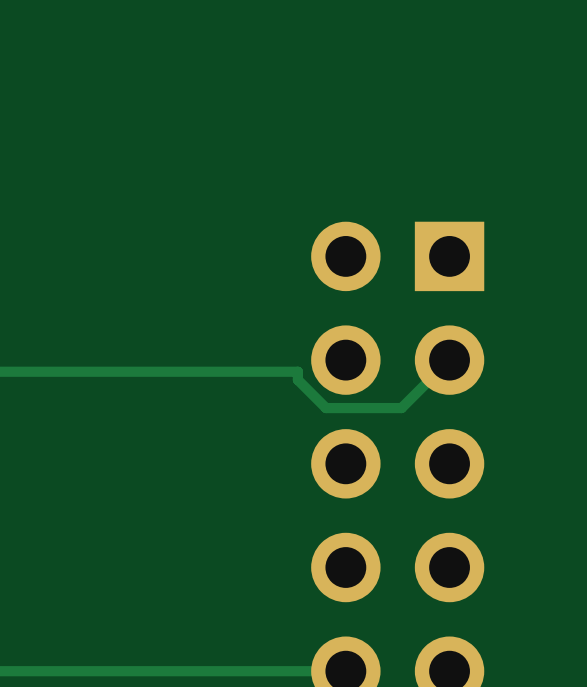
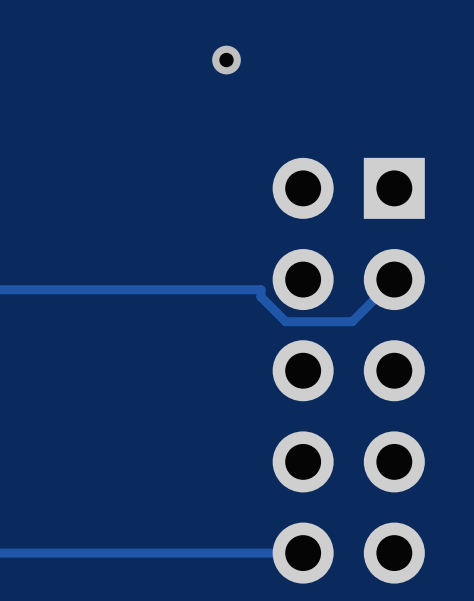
via: none -> (226, 60)

